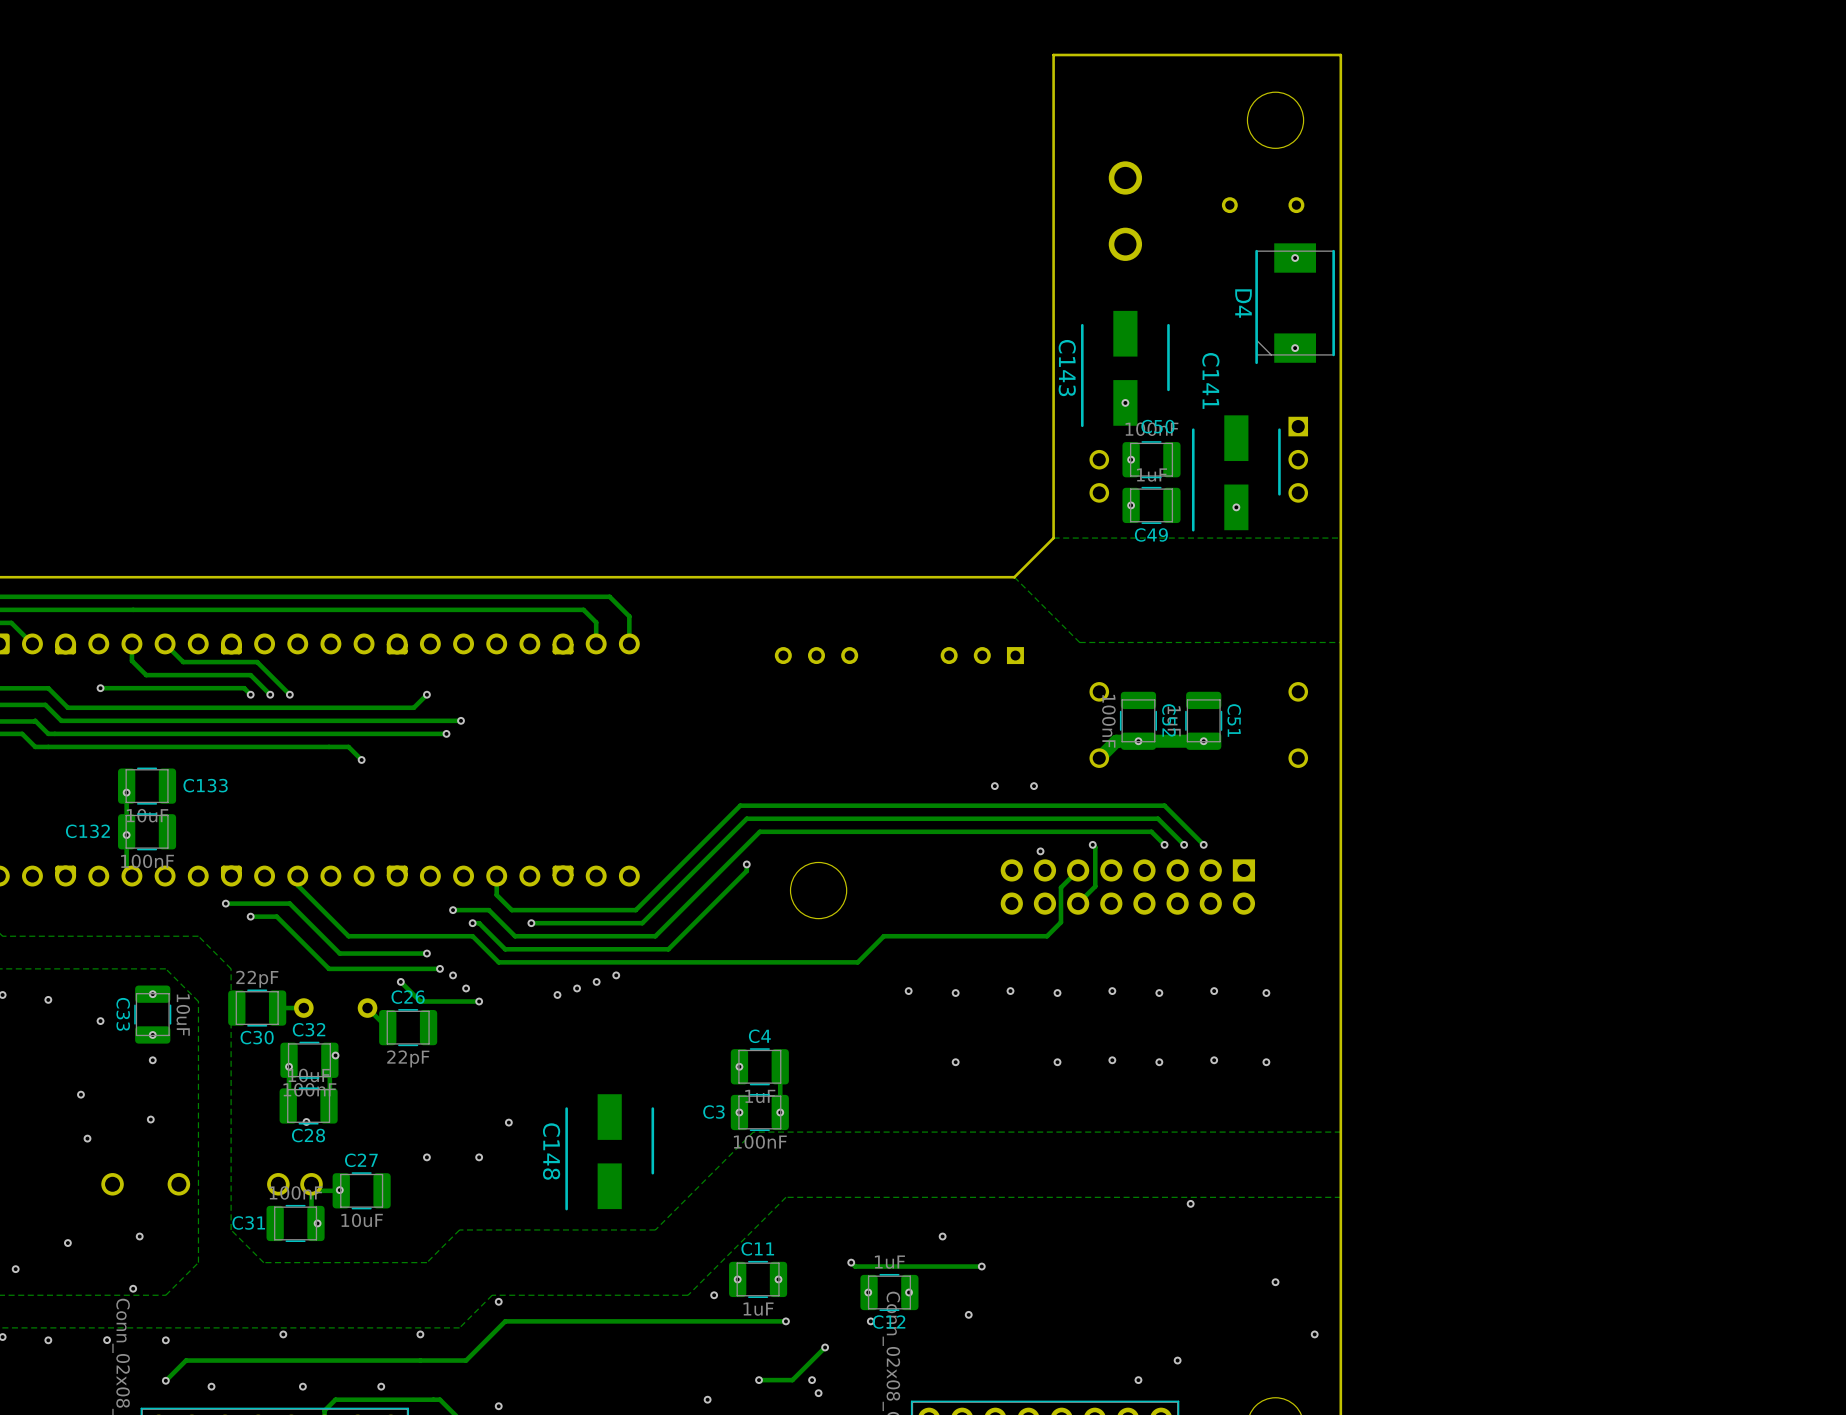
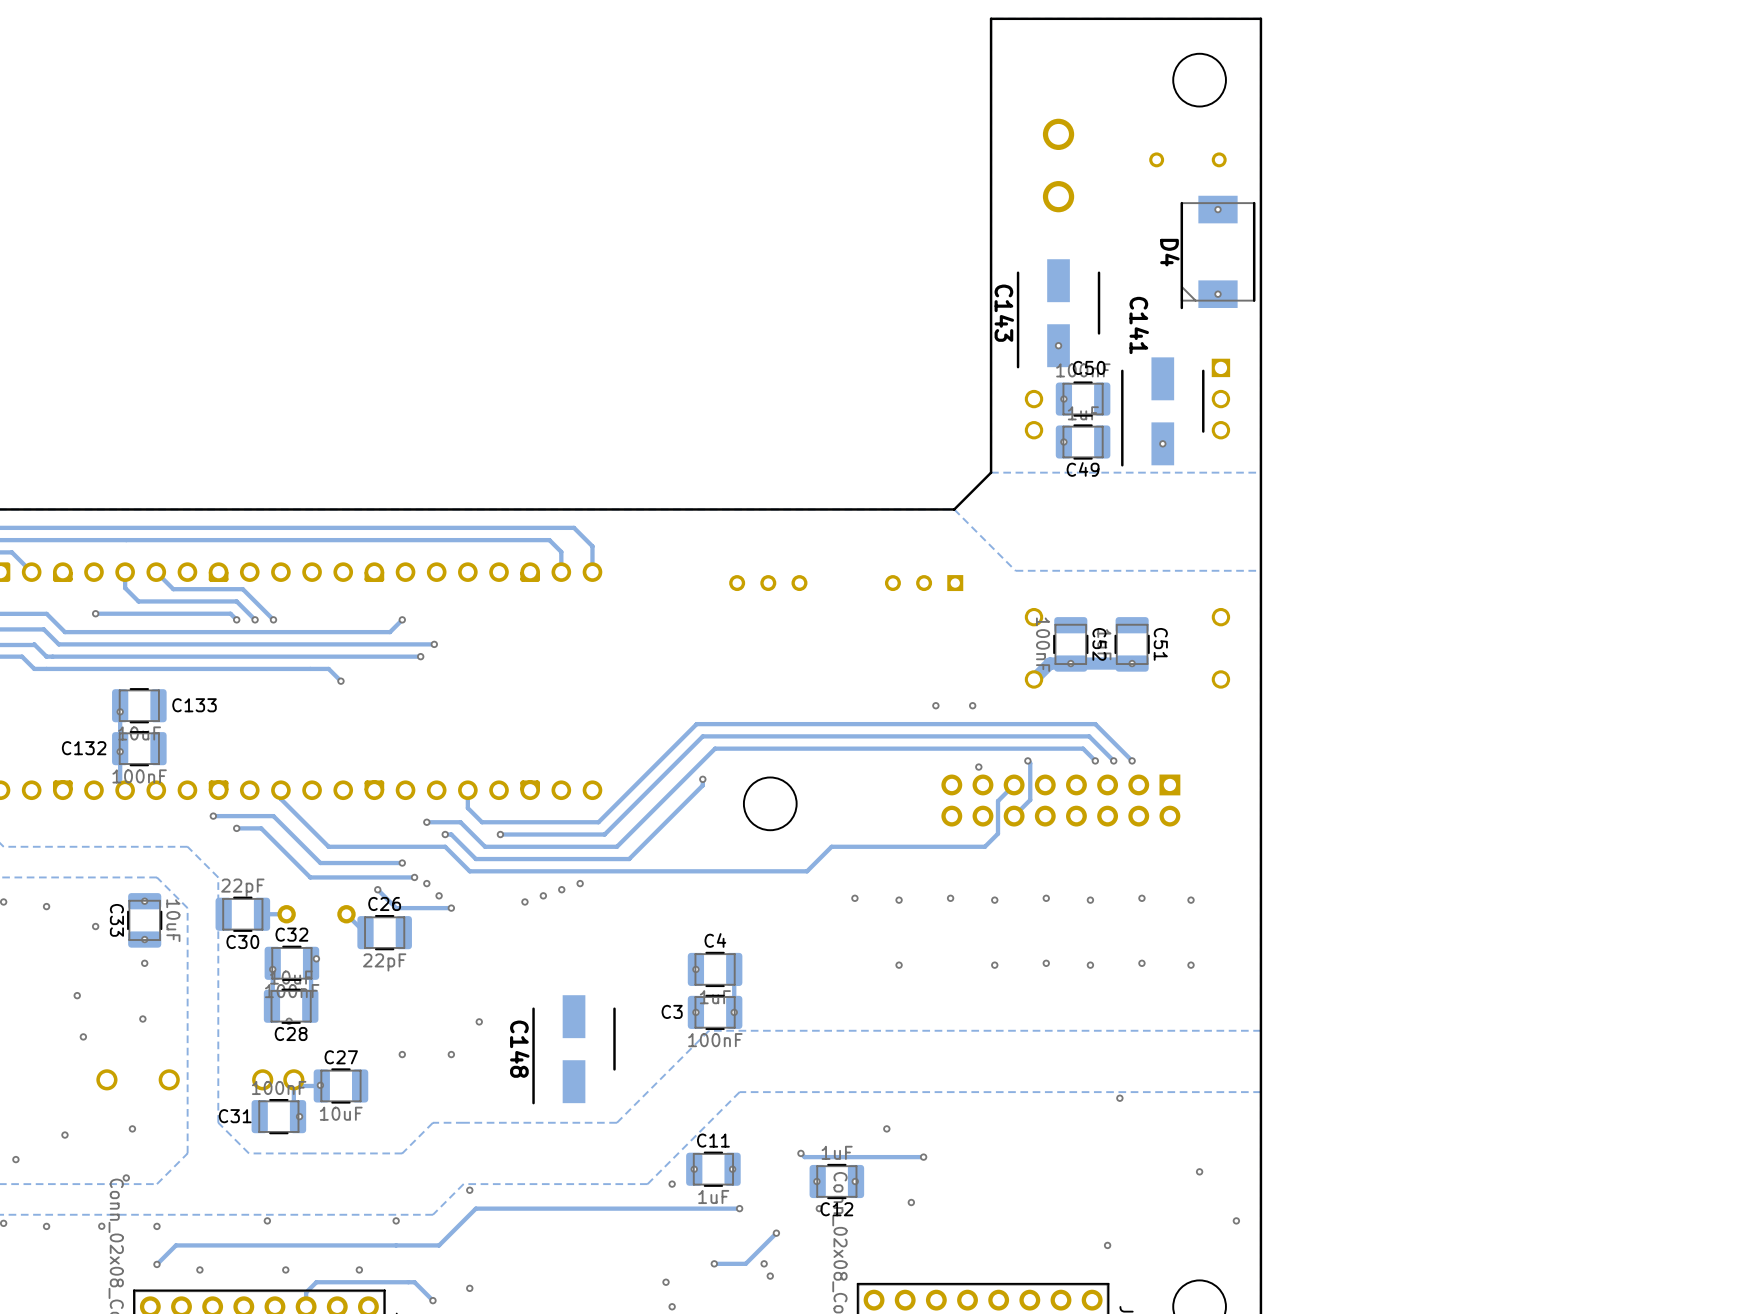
via: (1138, 1380) -> none

